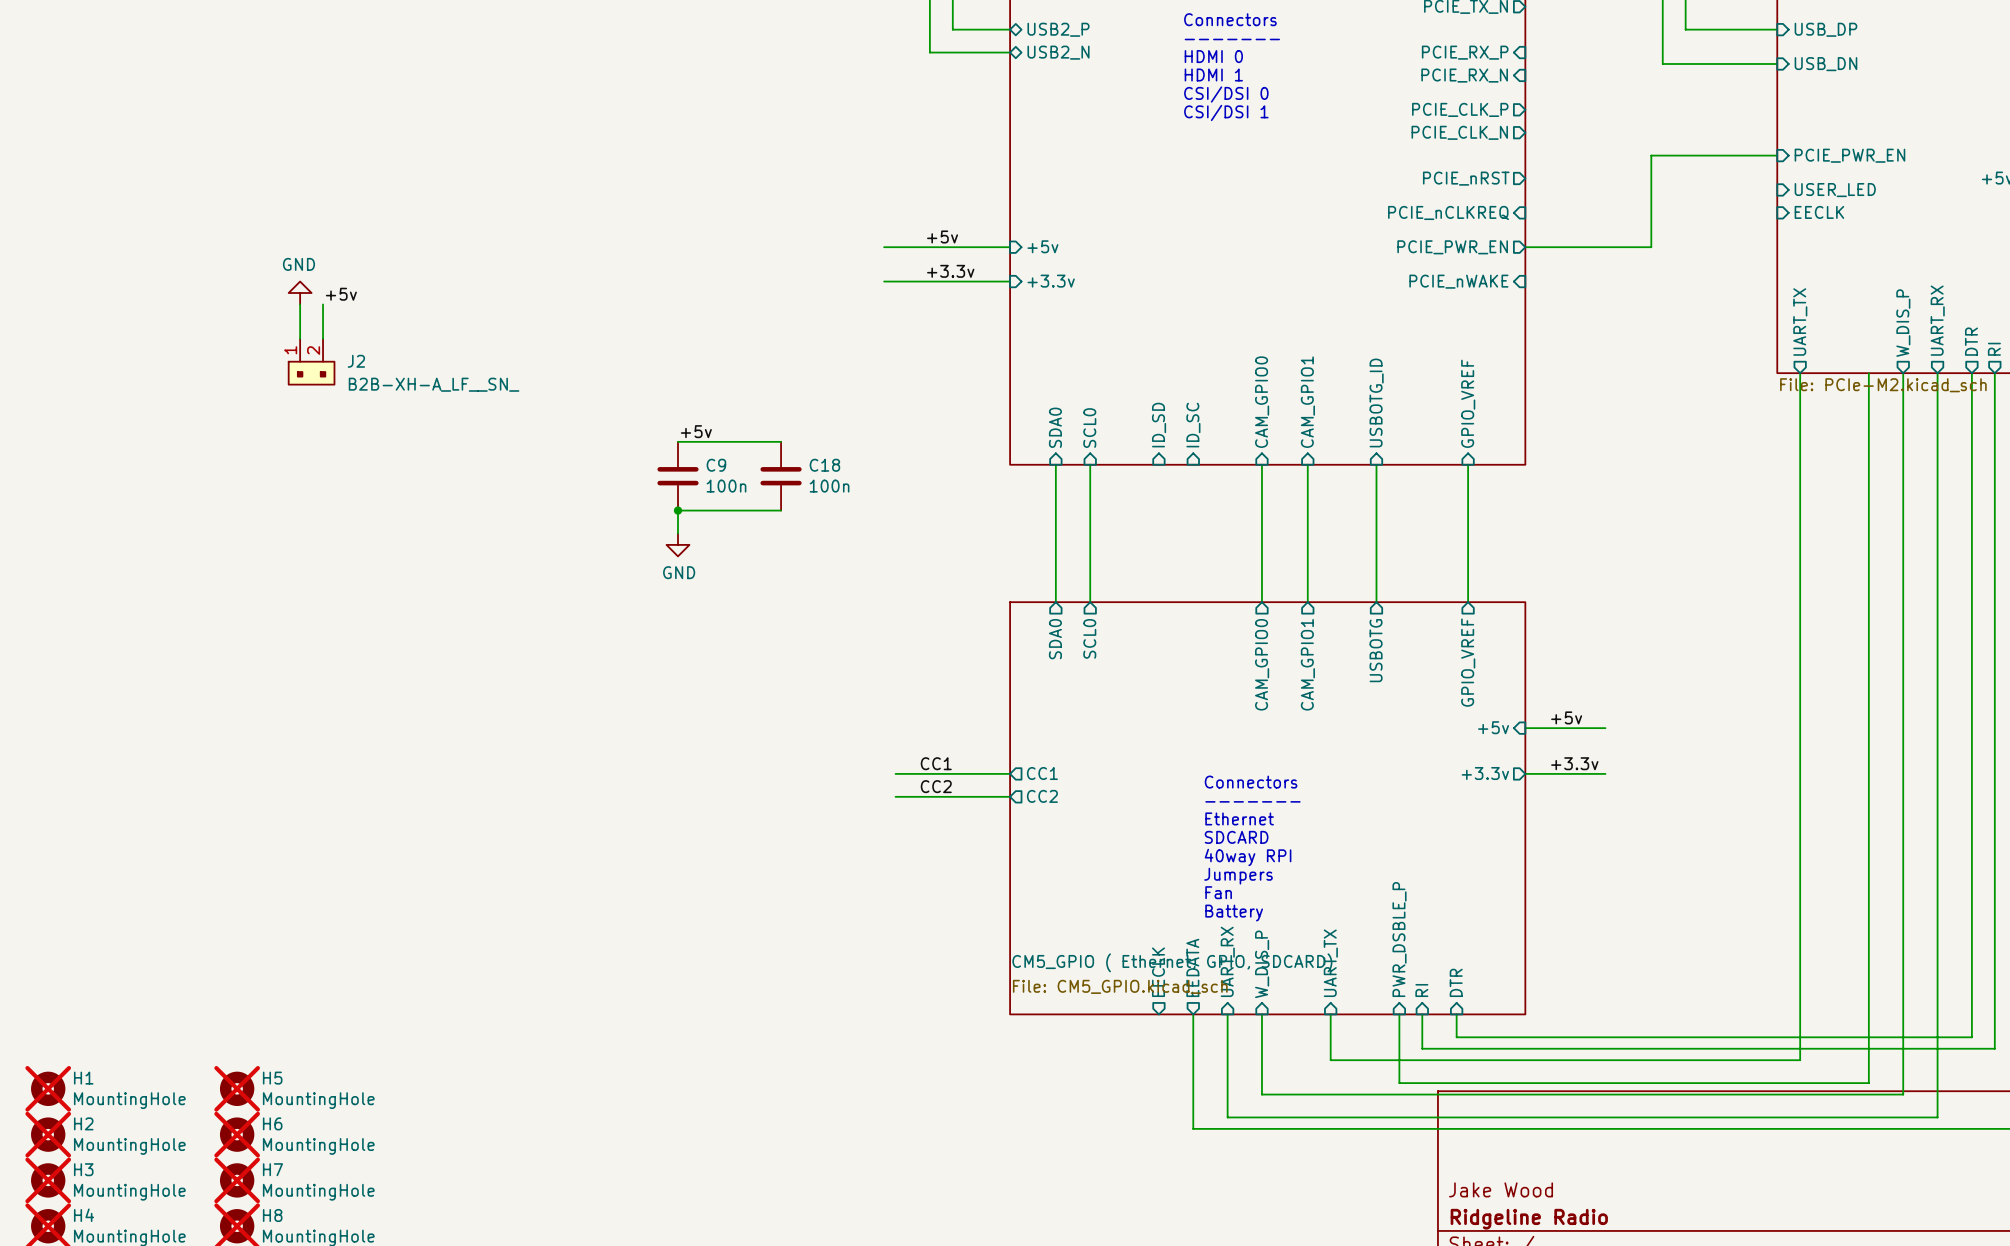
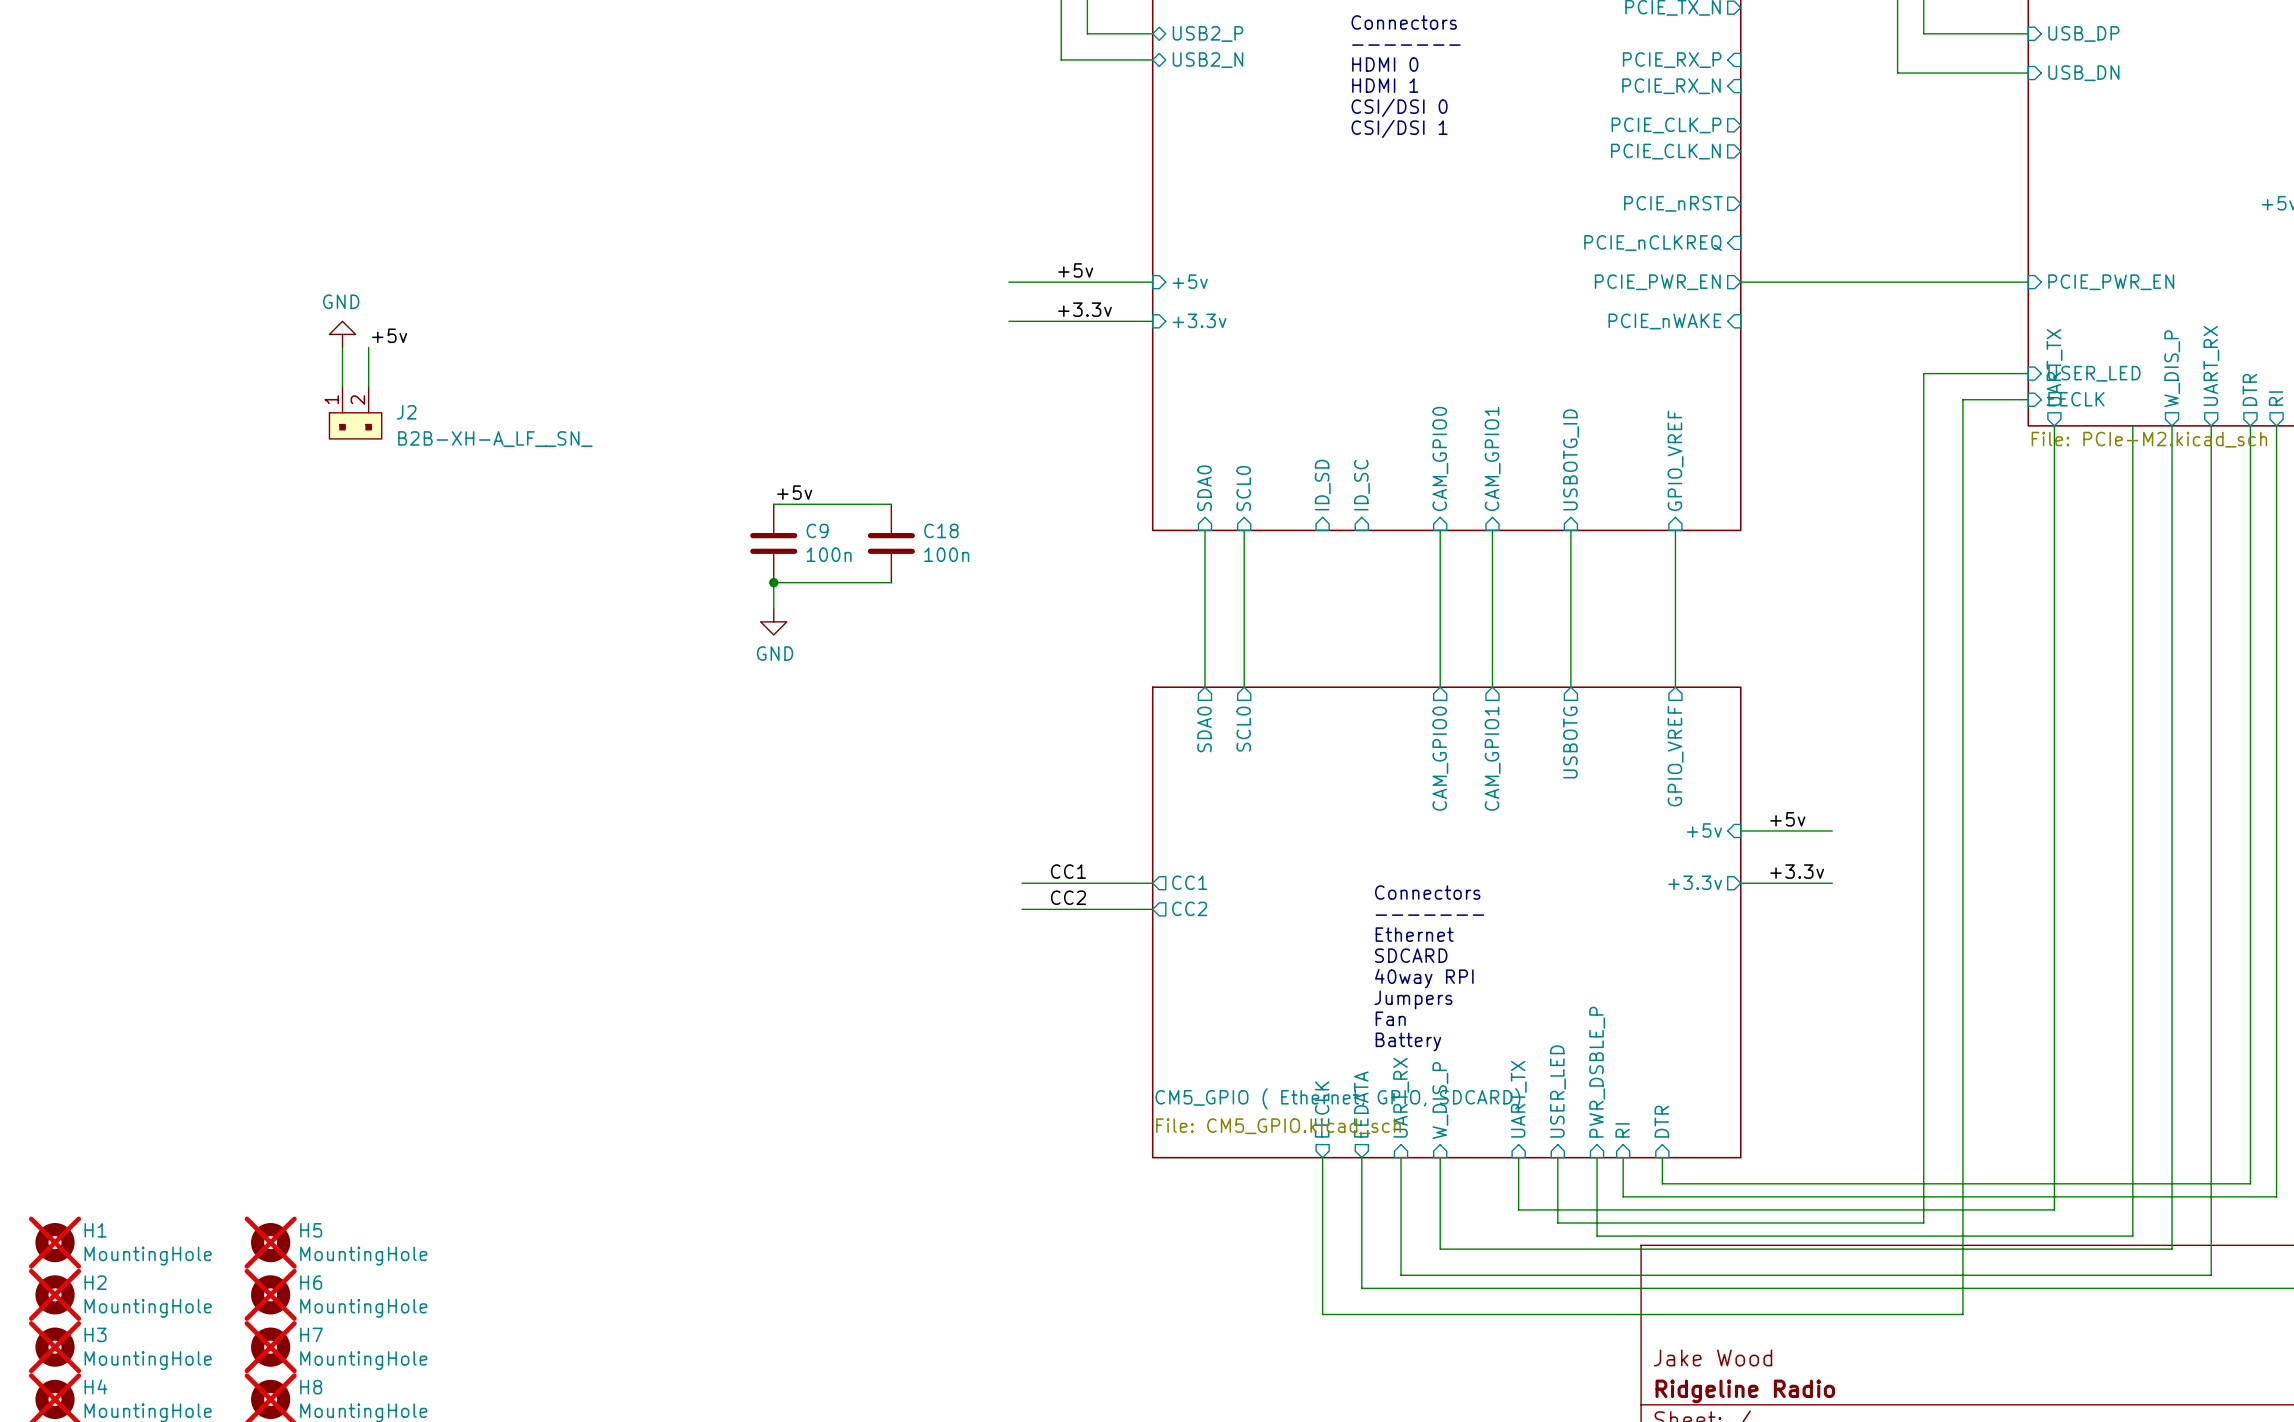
wire: (1777, 155) (1651, 155) (1651, 247) -> (2028, 282) (1884, 282)
sheet pin position: PCIE_PWR_EN (1849, 155) -> PCIE_PWR_EN (2111, 282)
sheet pin position: USER_LED (1835, 190) -> USER_LED (2094, 373)
sheet pin position: EECLK (1819, 212) -> EECLK (2076, 399)
wire: none -> (2028, 373) (1923, 373) (1923, 1223) (1557, 1223) (1557, 1157)
wire: none -> (2028, 399) (1962, 399) (1962, 1314) (1322, 1314) (1322, 1157)
sheet pin: none -> USER_LED (1557, 1091)

